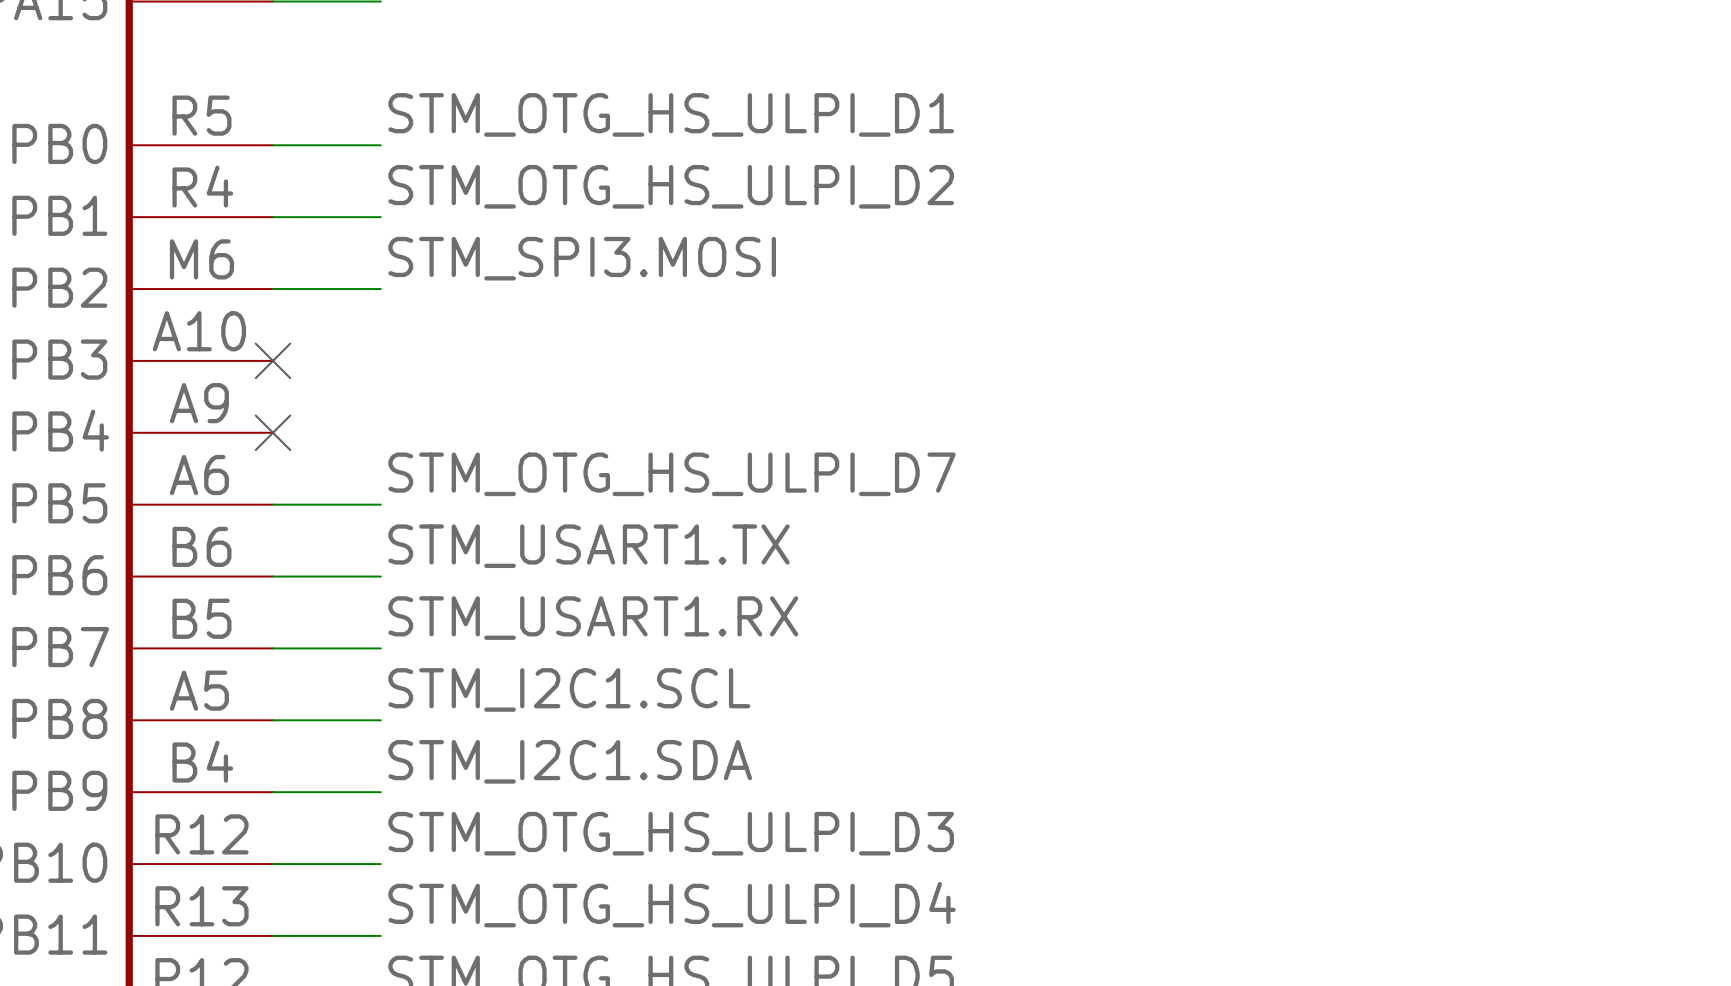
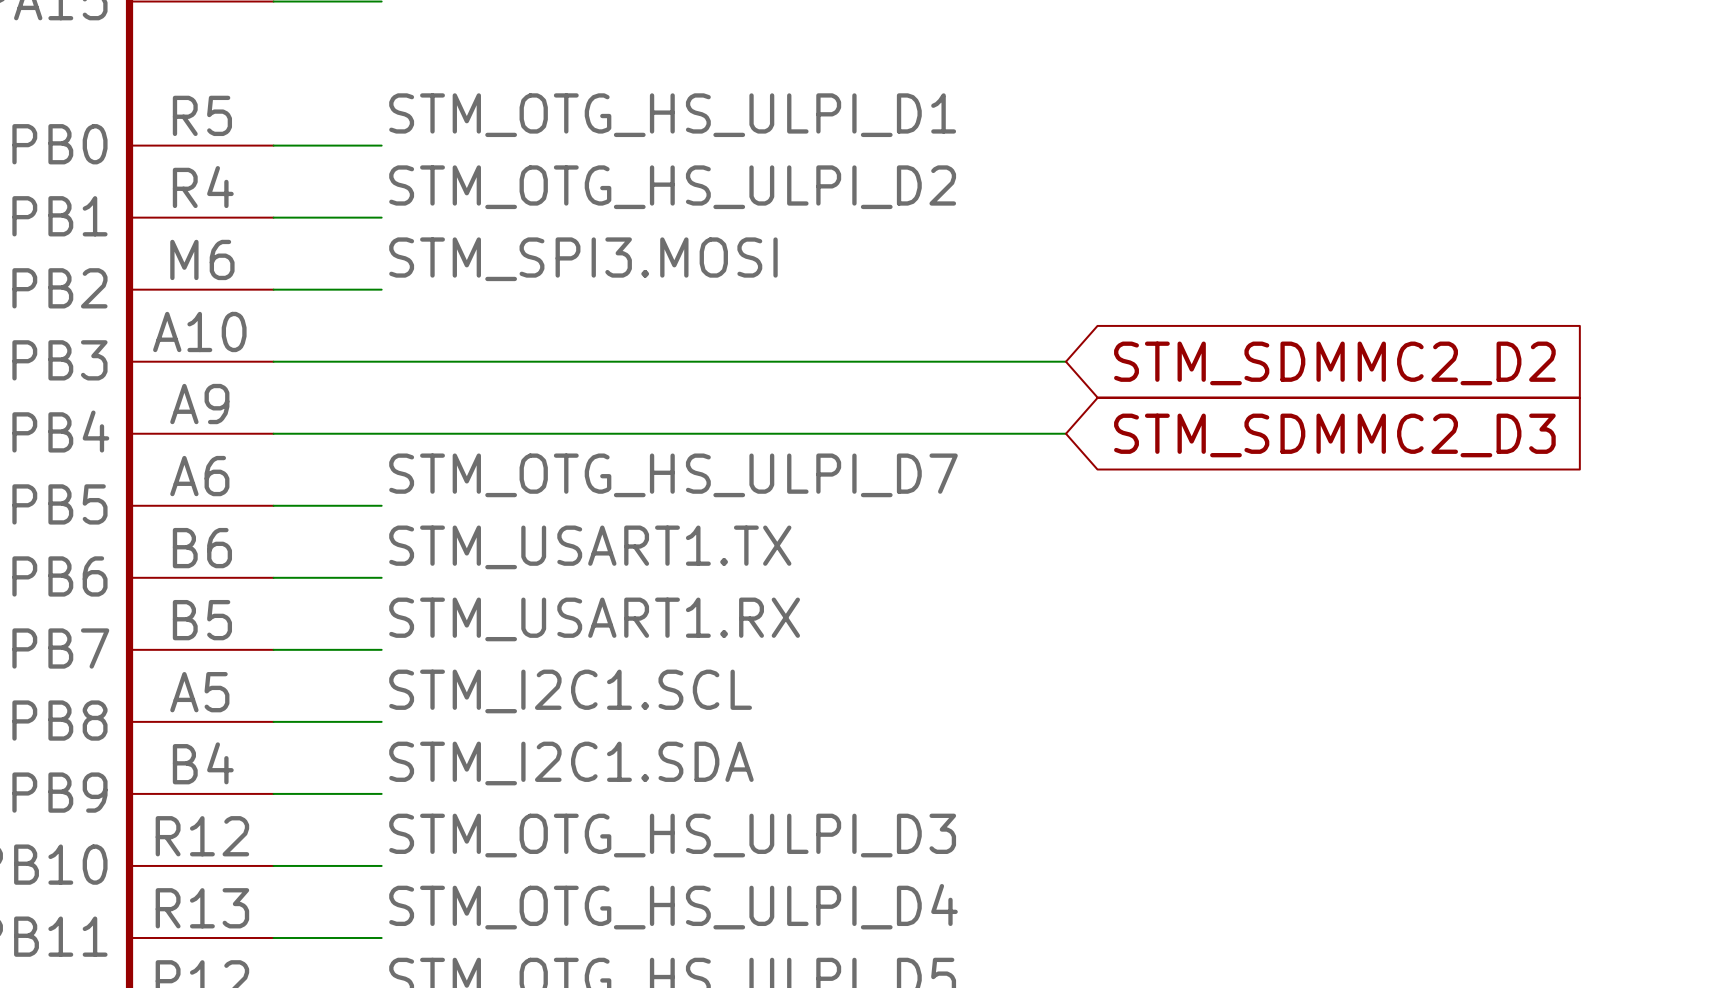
wire: none -> (273, 361) (1065, 361)
no-connect mark: (272, 360) -> none
global label: none -> STM_SDMMC2_D2 (1334, 363)
wire: none -> (273, 433) (1065, 433)
no-connect mark: (272, 432) -> none
global label: none -> STM_SDMMC2_D3 (1334, 435)

